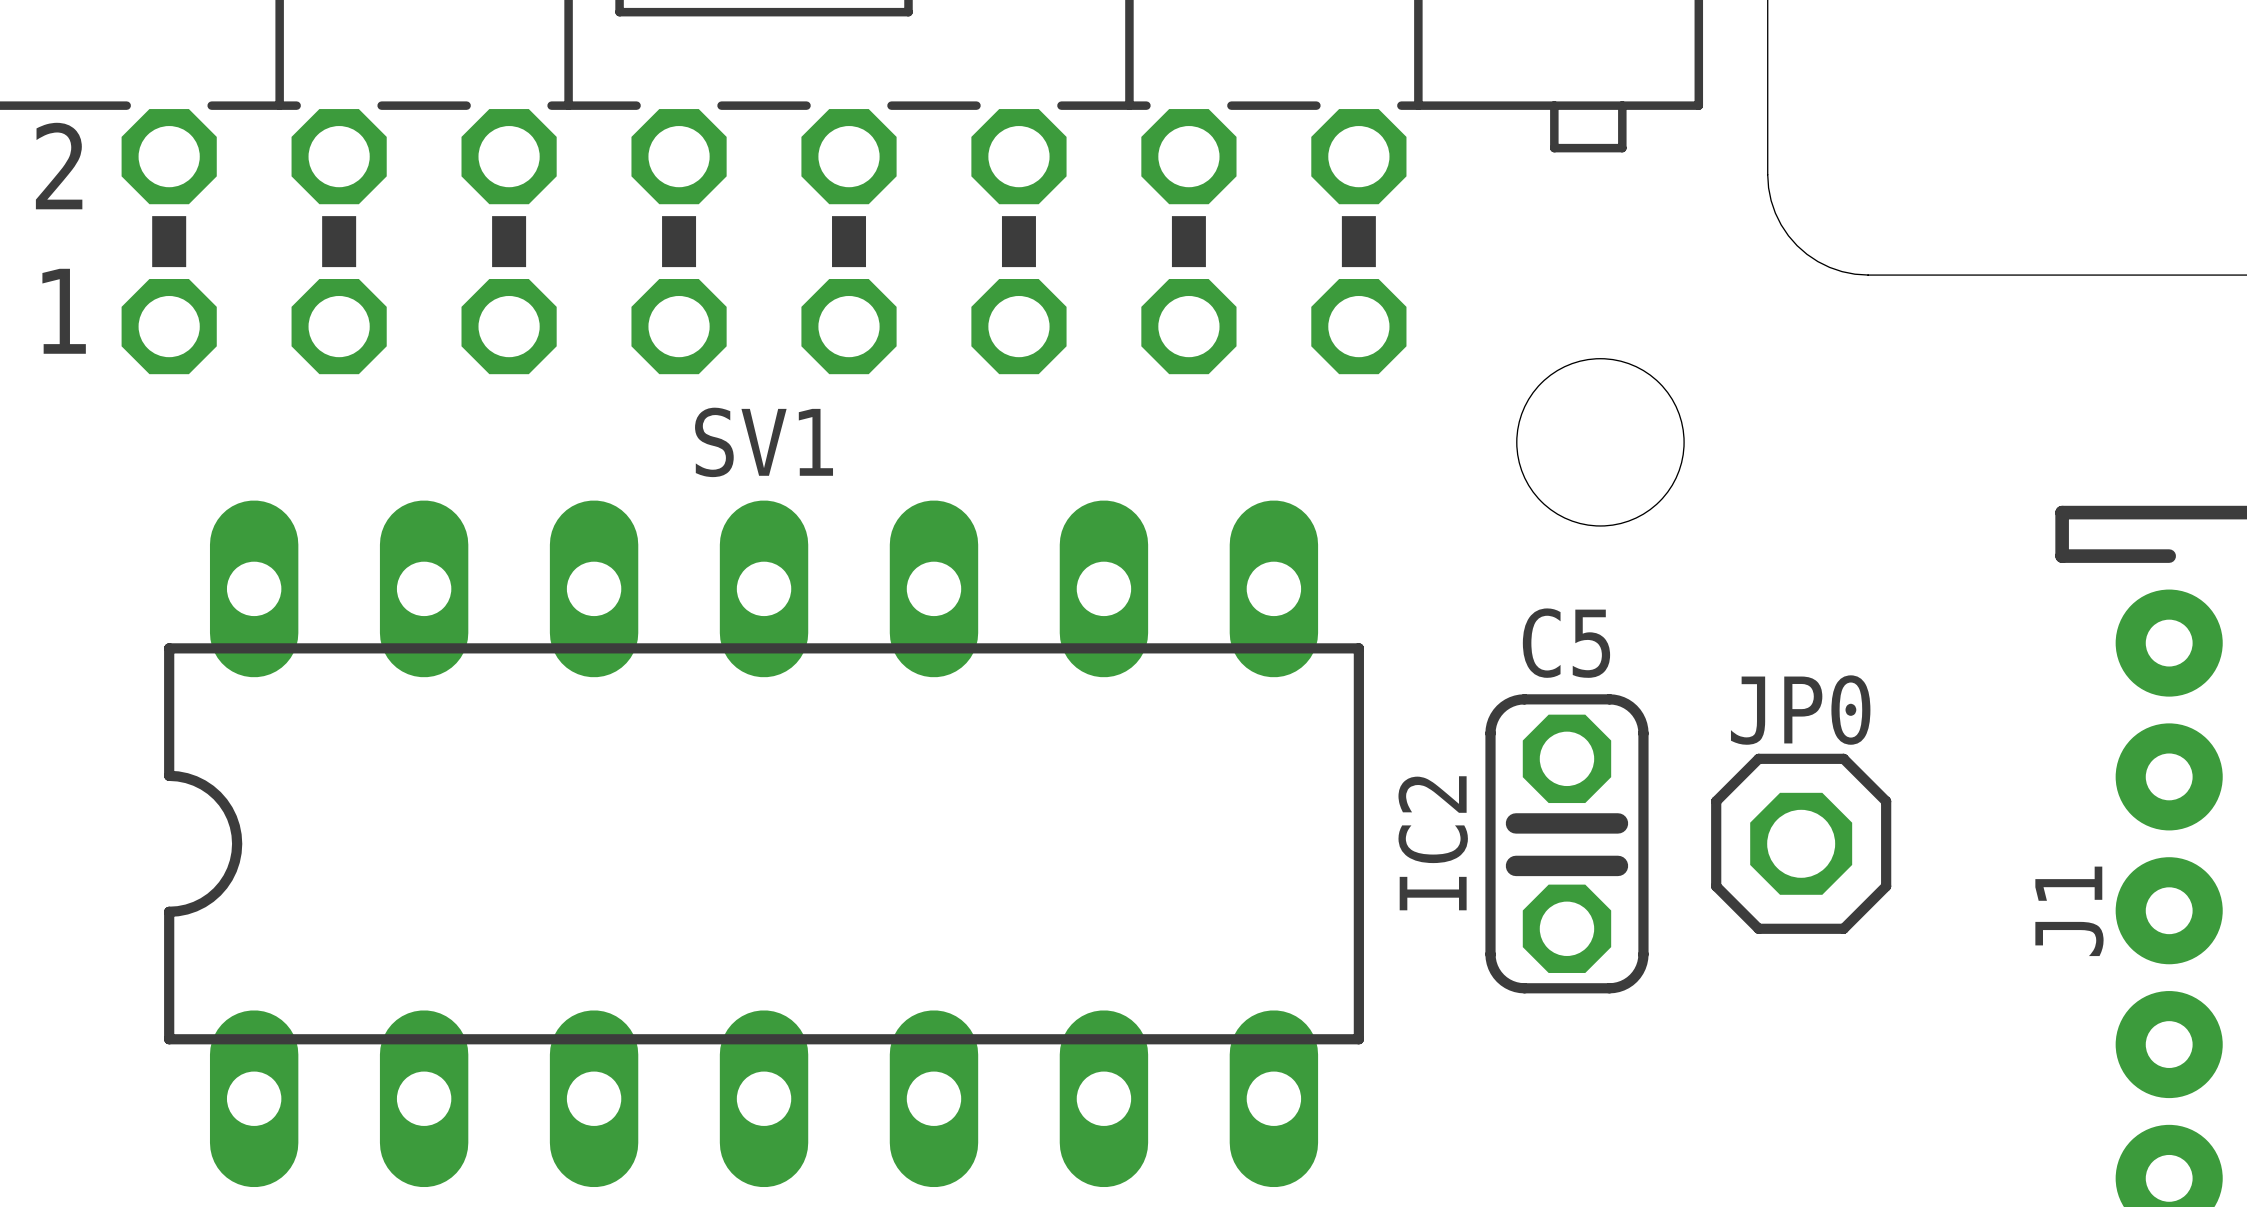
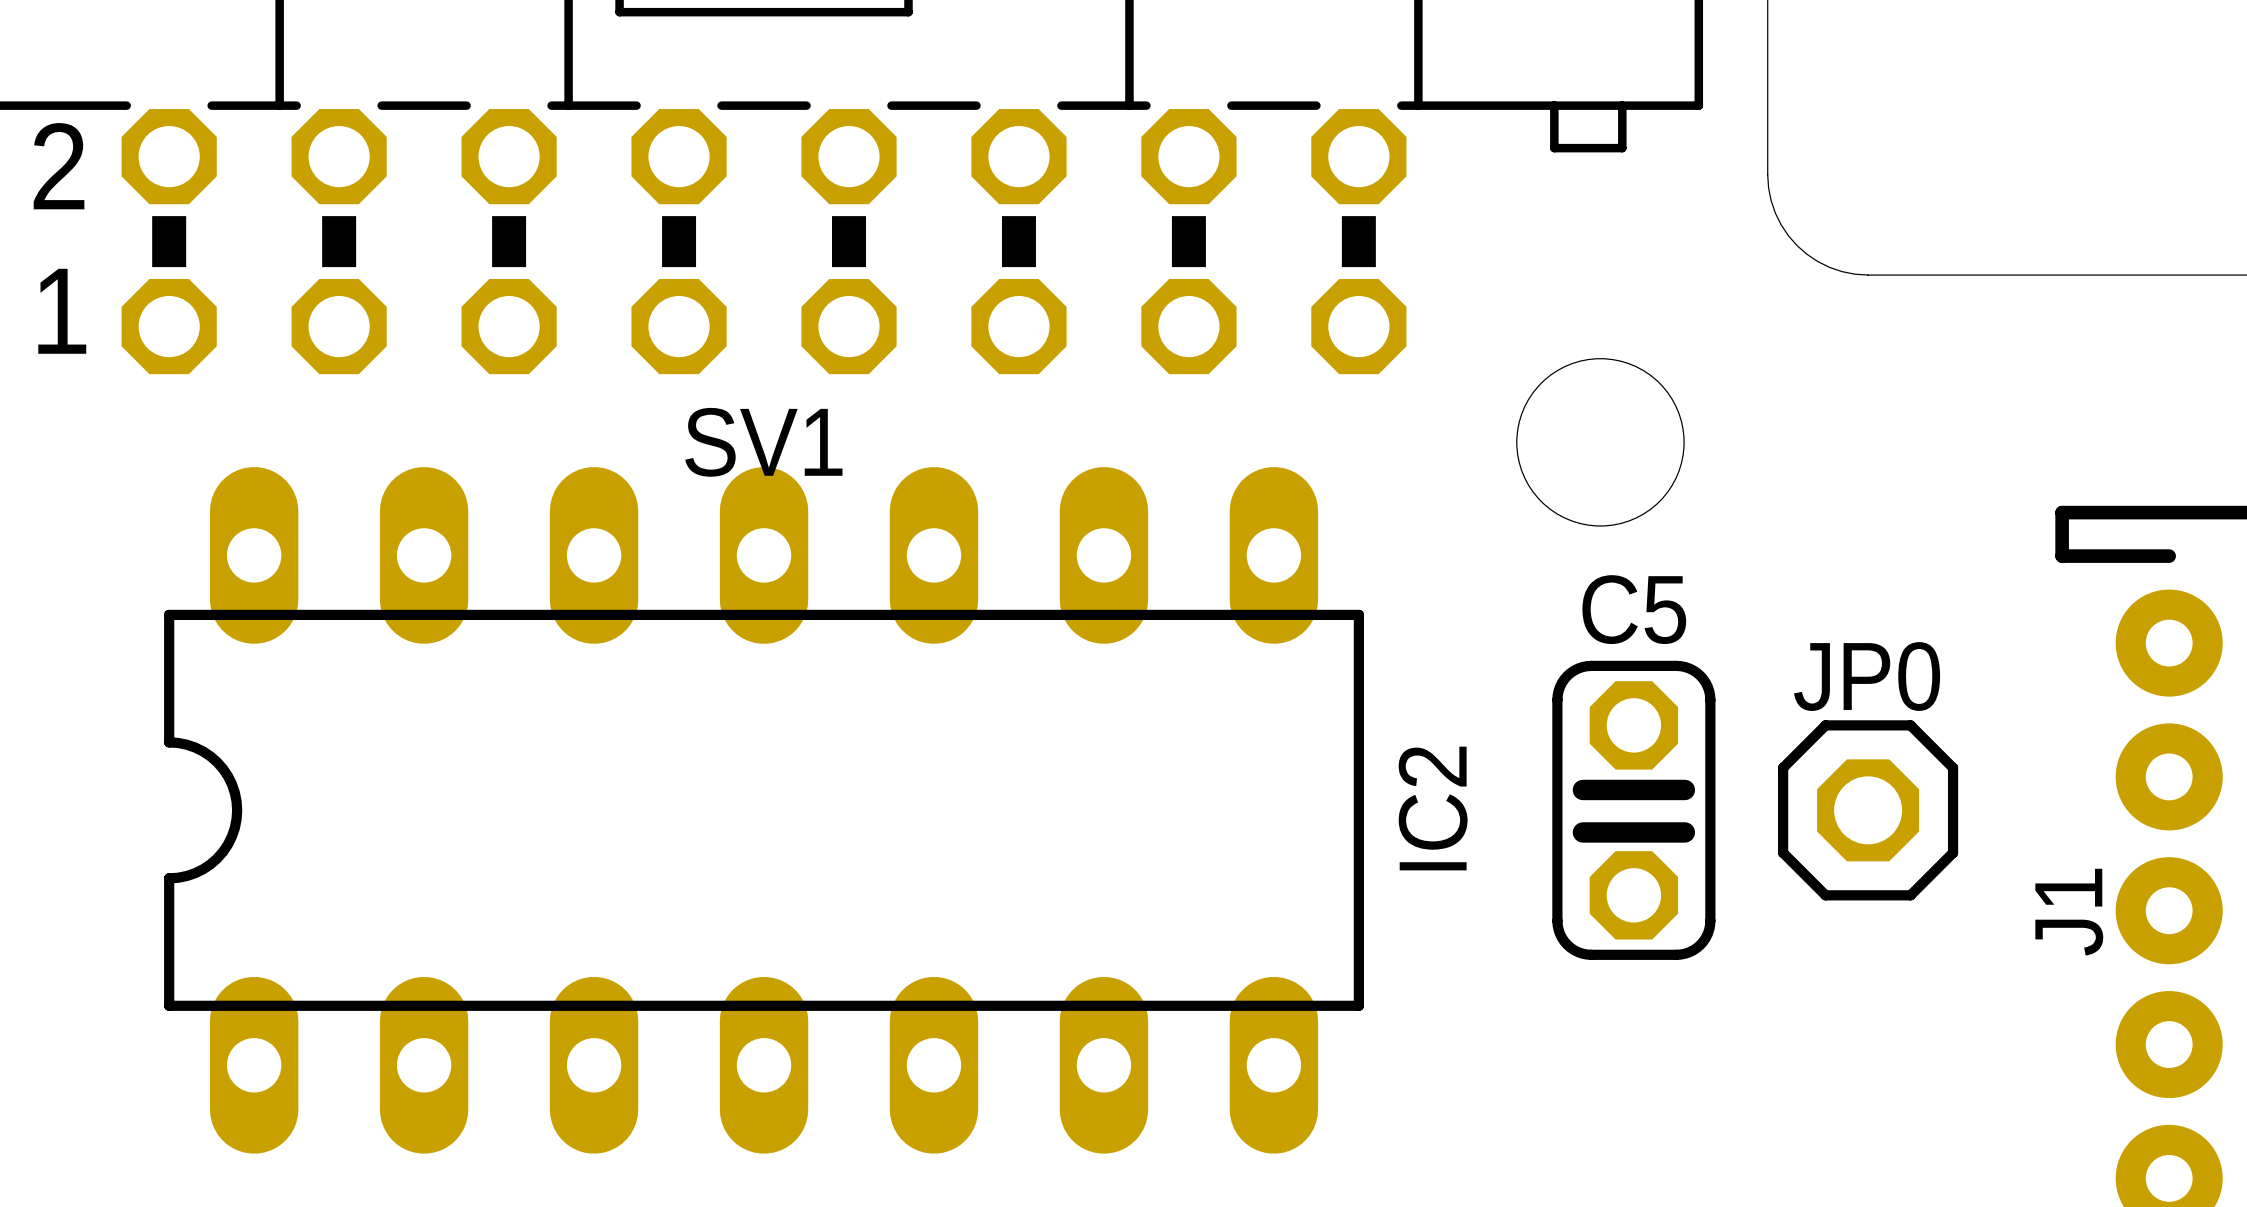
IC2 position: (764, 843) -> (764, 810)
C5 position: (1566, 843) -> (1633, 810)
JP0 position: (1801, 843) -> (1868, 810)

